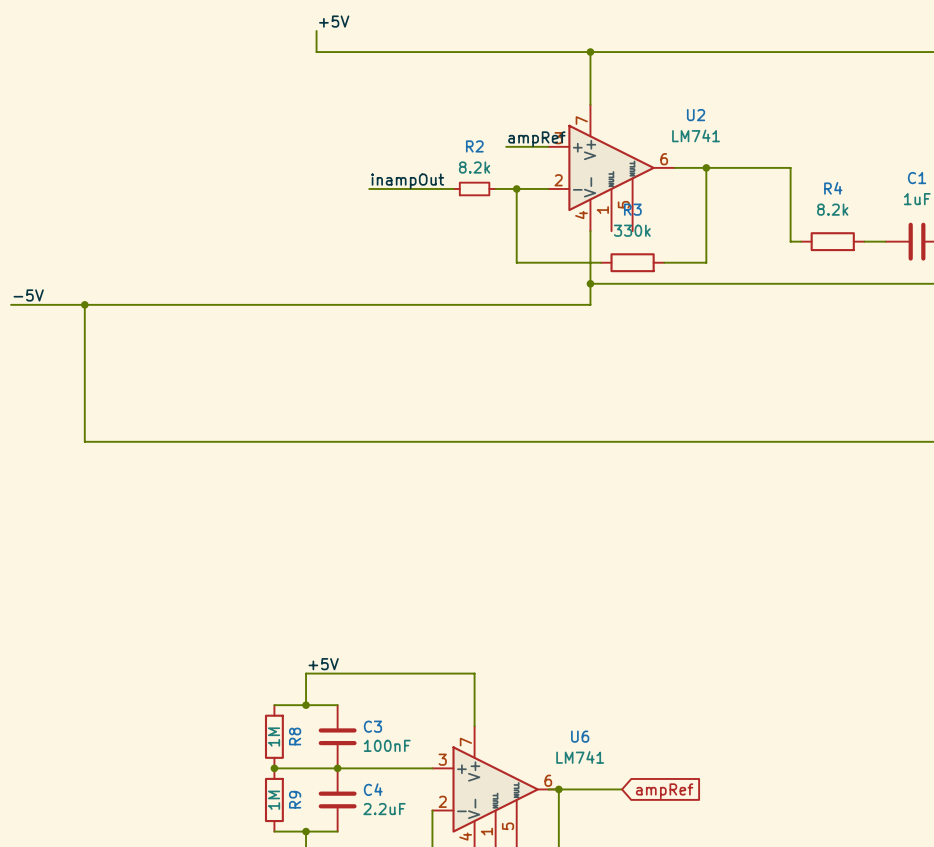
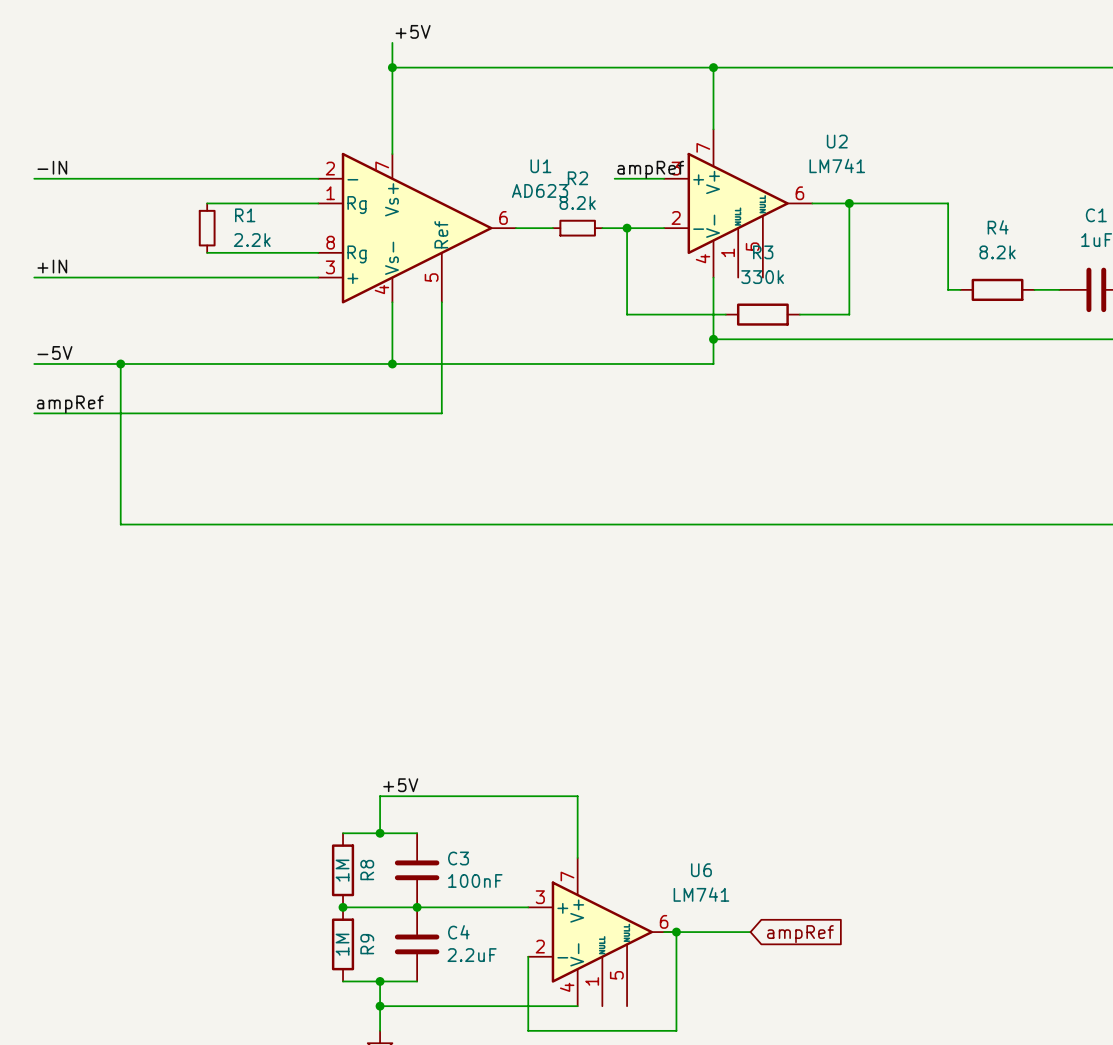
wire: none -> (392, 67) (392, 154)
junction: none -> (392, 67)
label: none -> -IN (52, 167)
wire: none -> (34, 178) (318, 178)
wire: none -> (207, 203) (318, 203)
label: inampOut (407, 181) -> none
R1: none -> 2.2k (207, 228)
U1: none -> AD623 (417, 228)
wire: none -> (207, 252) (318, 252)
label: none -> +IN (52, 266)
wire: none -> (34, 277) (318, 277)
wire: none -> (392, 302) (392, 363)
wire: none -> (441, 302) (441, 413) (34, 413)
junction: none -> (392, 363)
label: none -> ampRef (70, 404)

